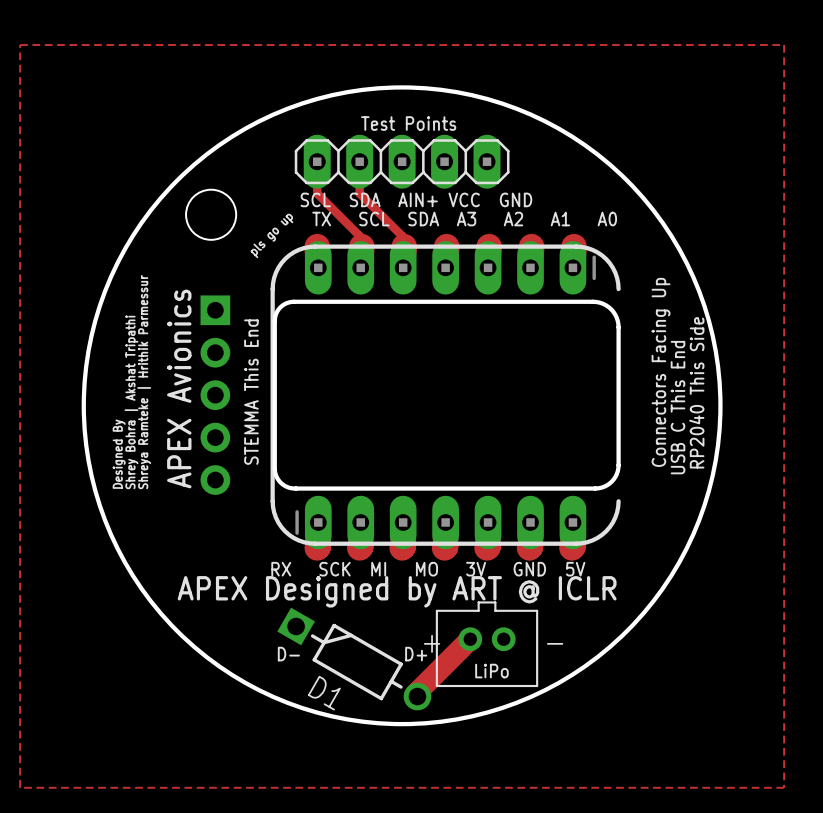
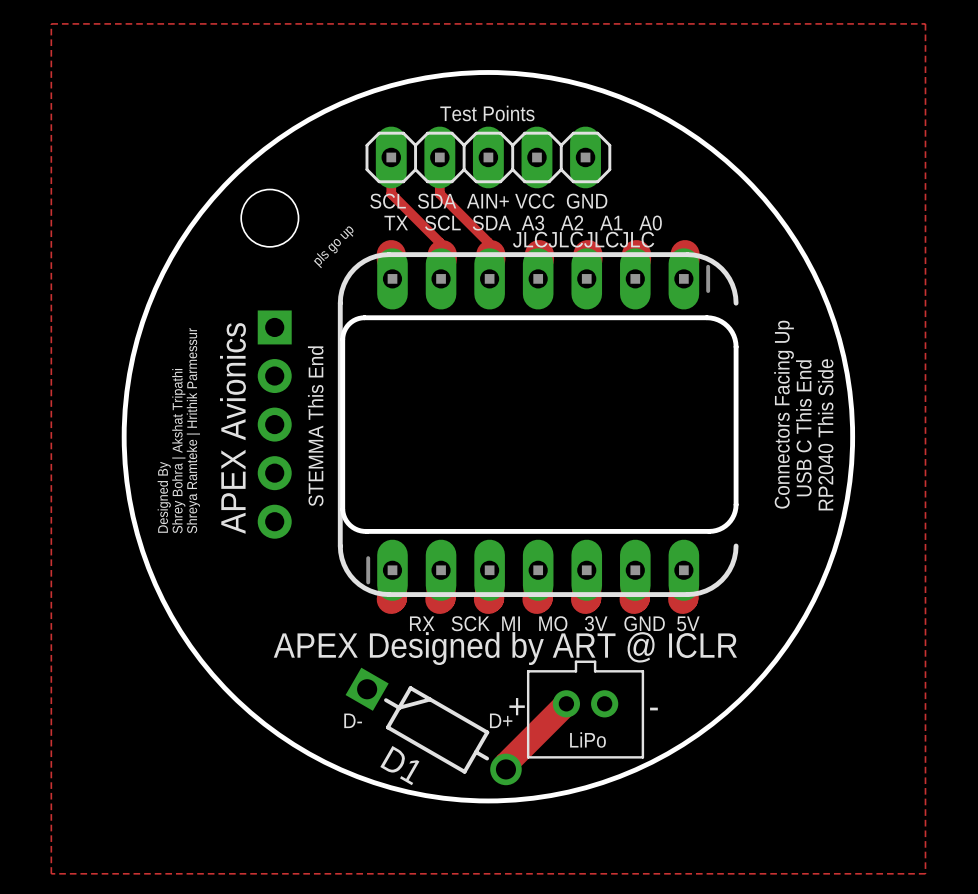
text: none -> JLCJLCJLCJLC (583, 239)

